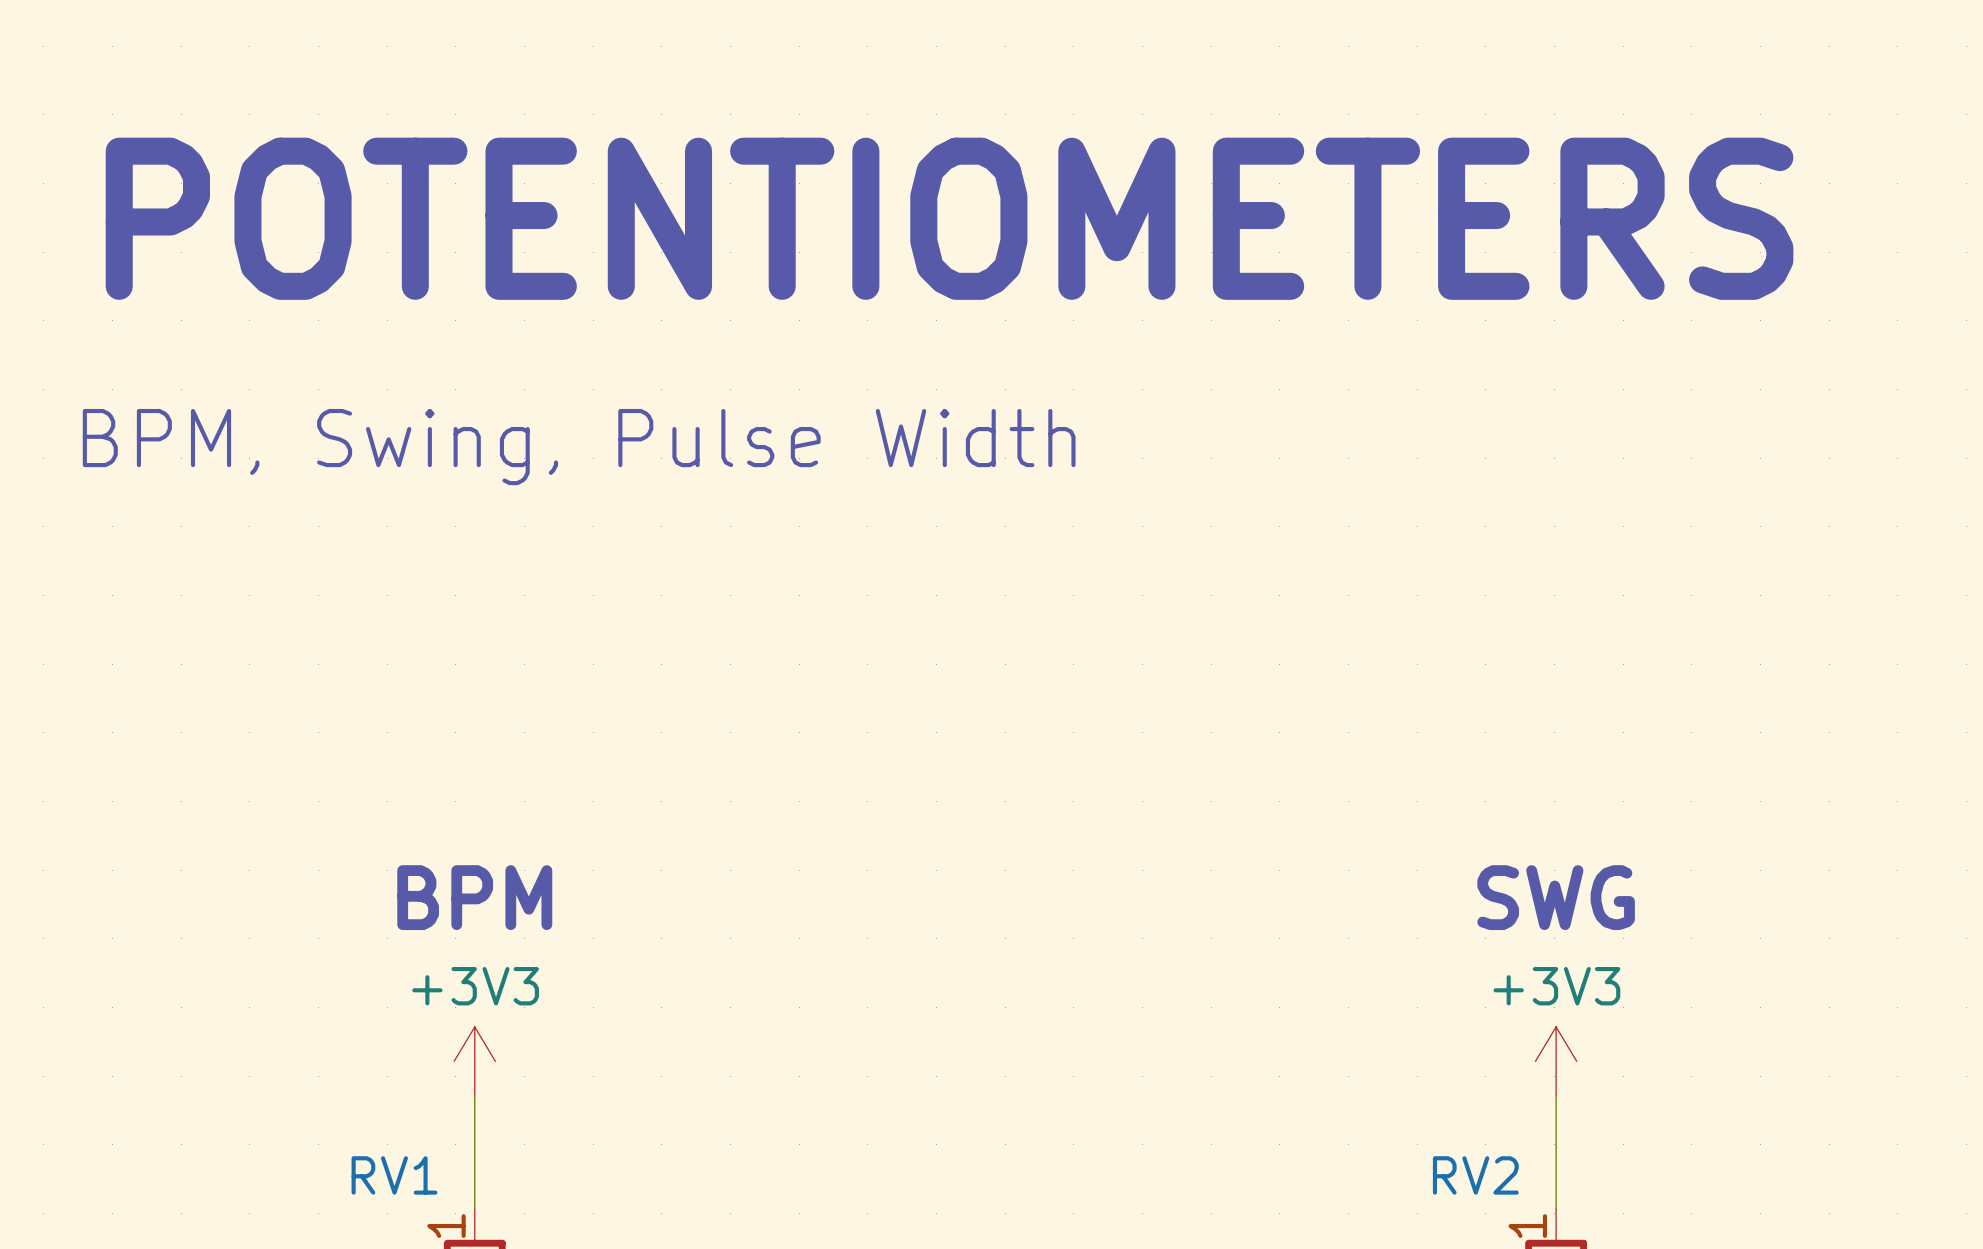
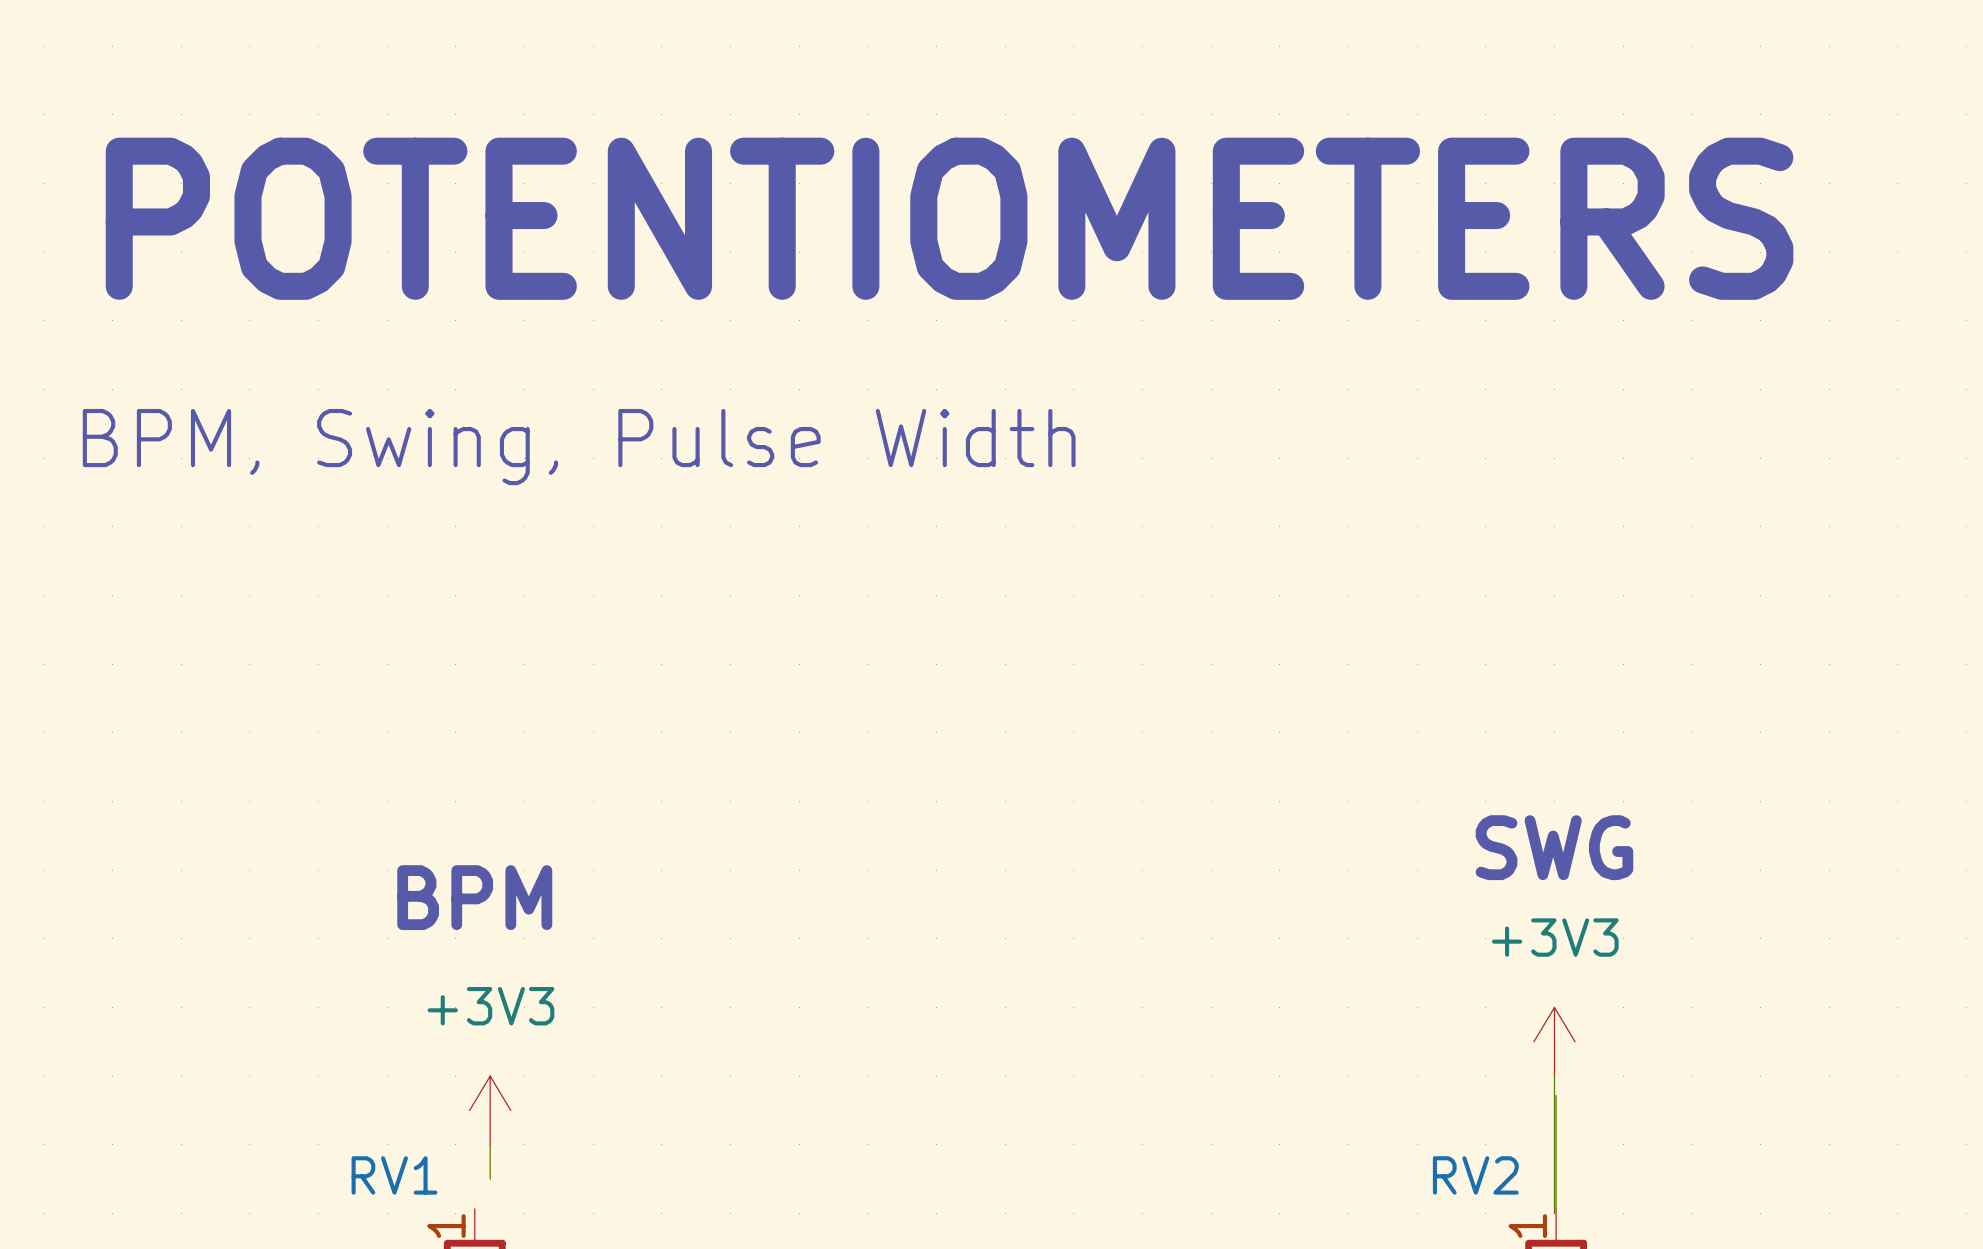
text position: SWG (1556, 897) -> SWG (1554, 847)
power symbol text position: +3V3 (475, 986) -> +3V3 (491, 1006)
power symbol text position: +3V3 (1556, 986) -> +3V3 (1555, 937)
power symbol position: +3V3 (474, 1061) -> +3V3 (490, 1110)
power symbol position: +3V3 (1556, 1061) -> +3V3 (1554, 1041)
wire: none -> (1554, 1076) (1554, 1213)
wire: (474, 1095) (474, 1208) -> none
wire: none -> (490, 1144) (490, 1179)

